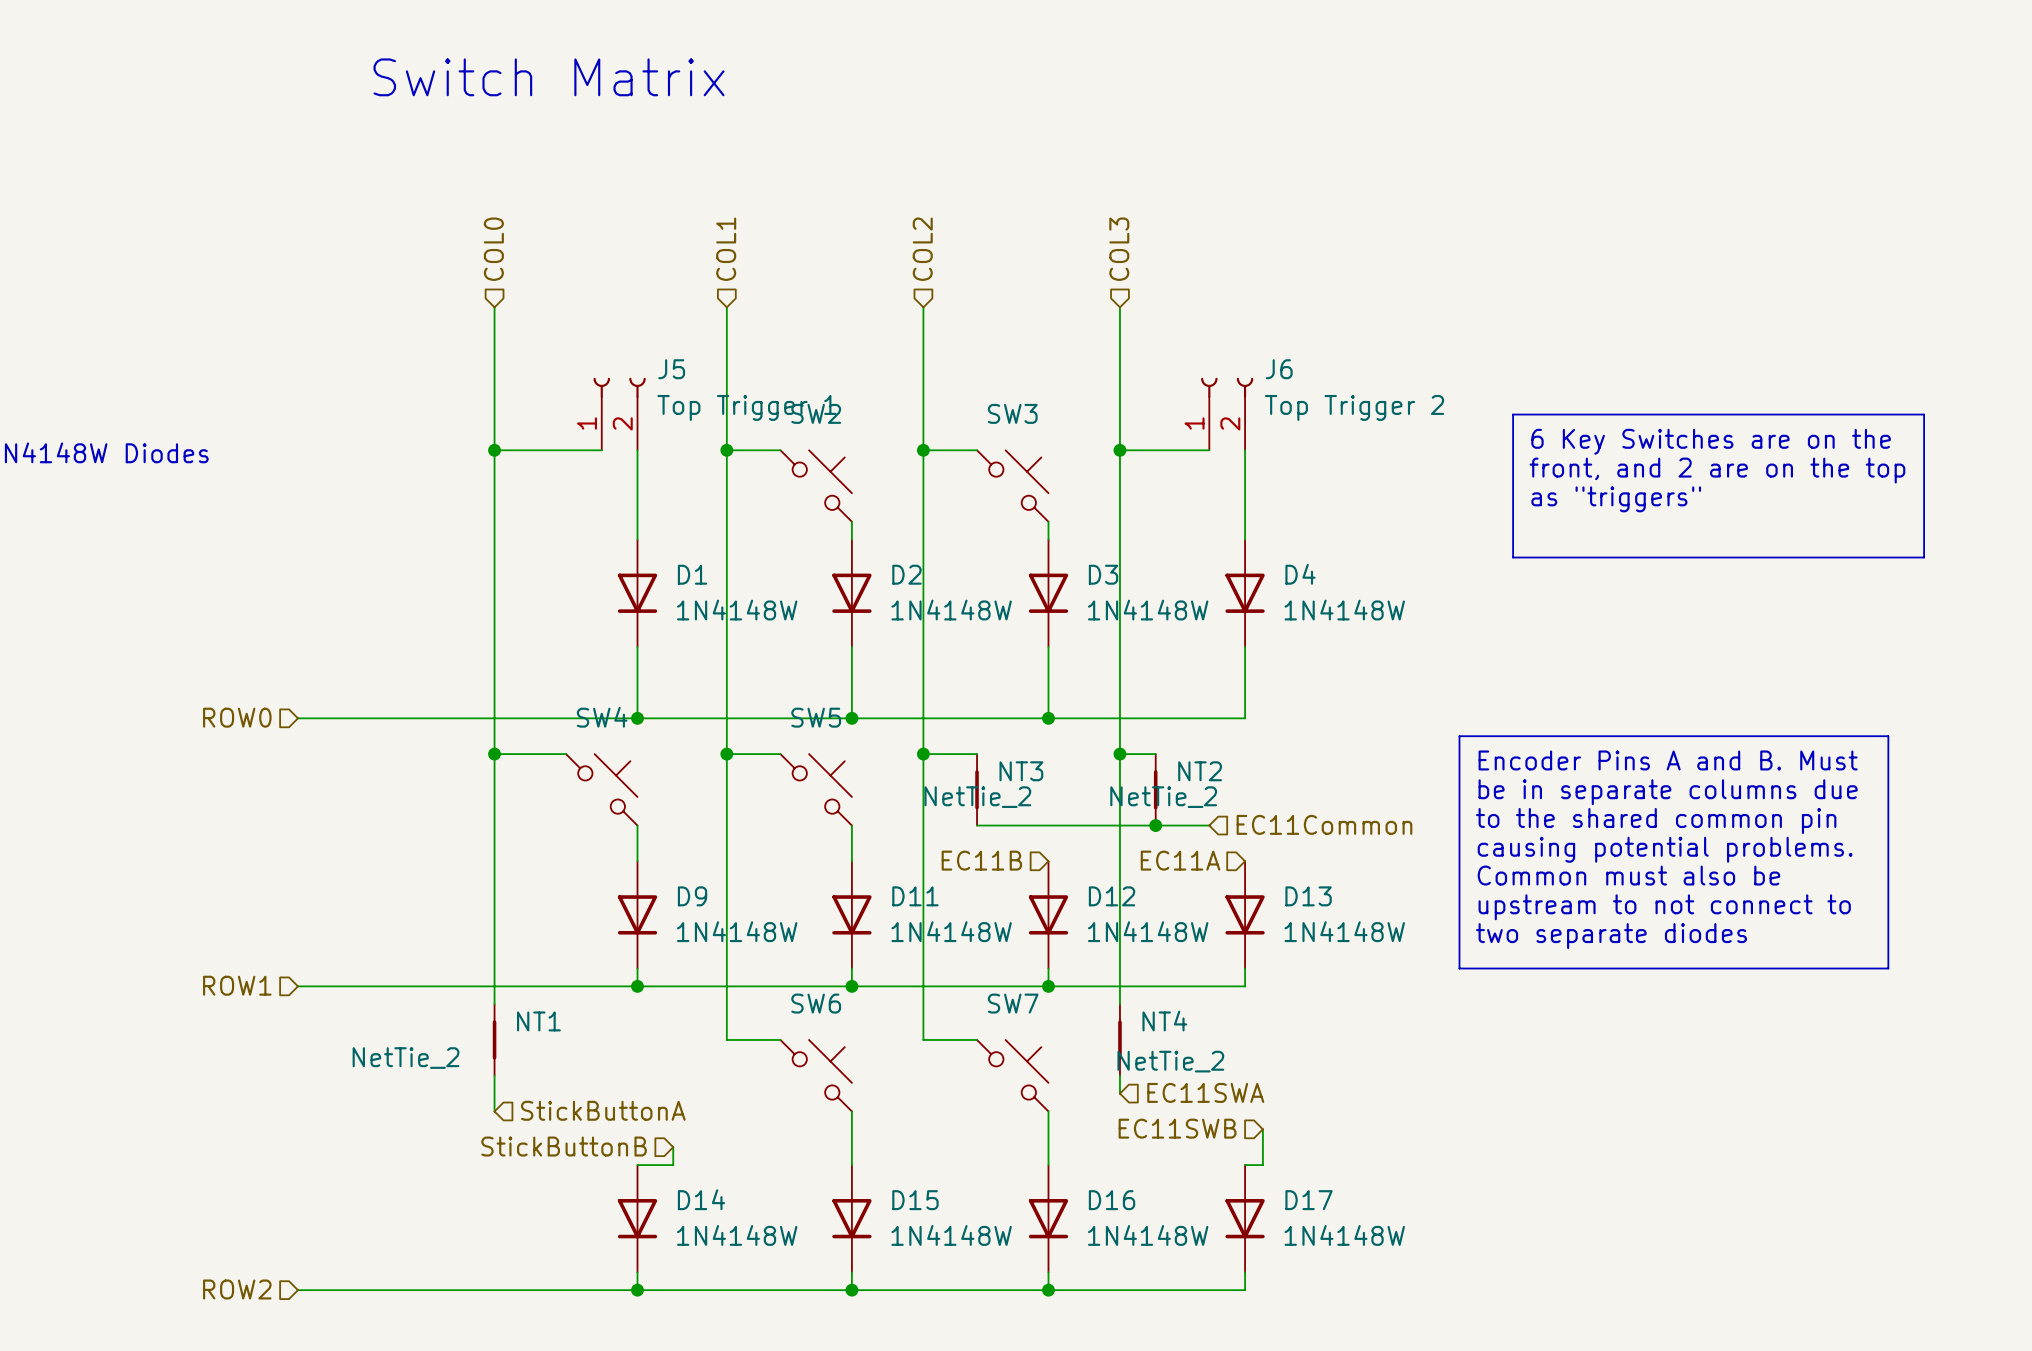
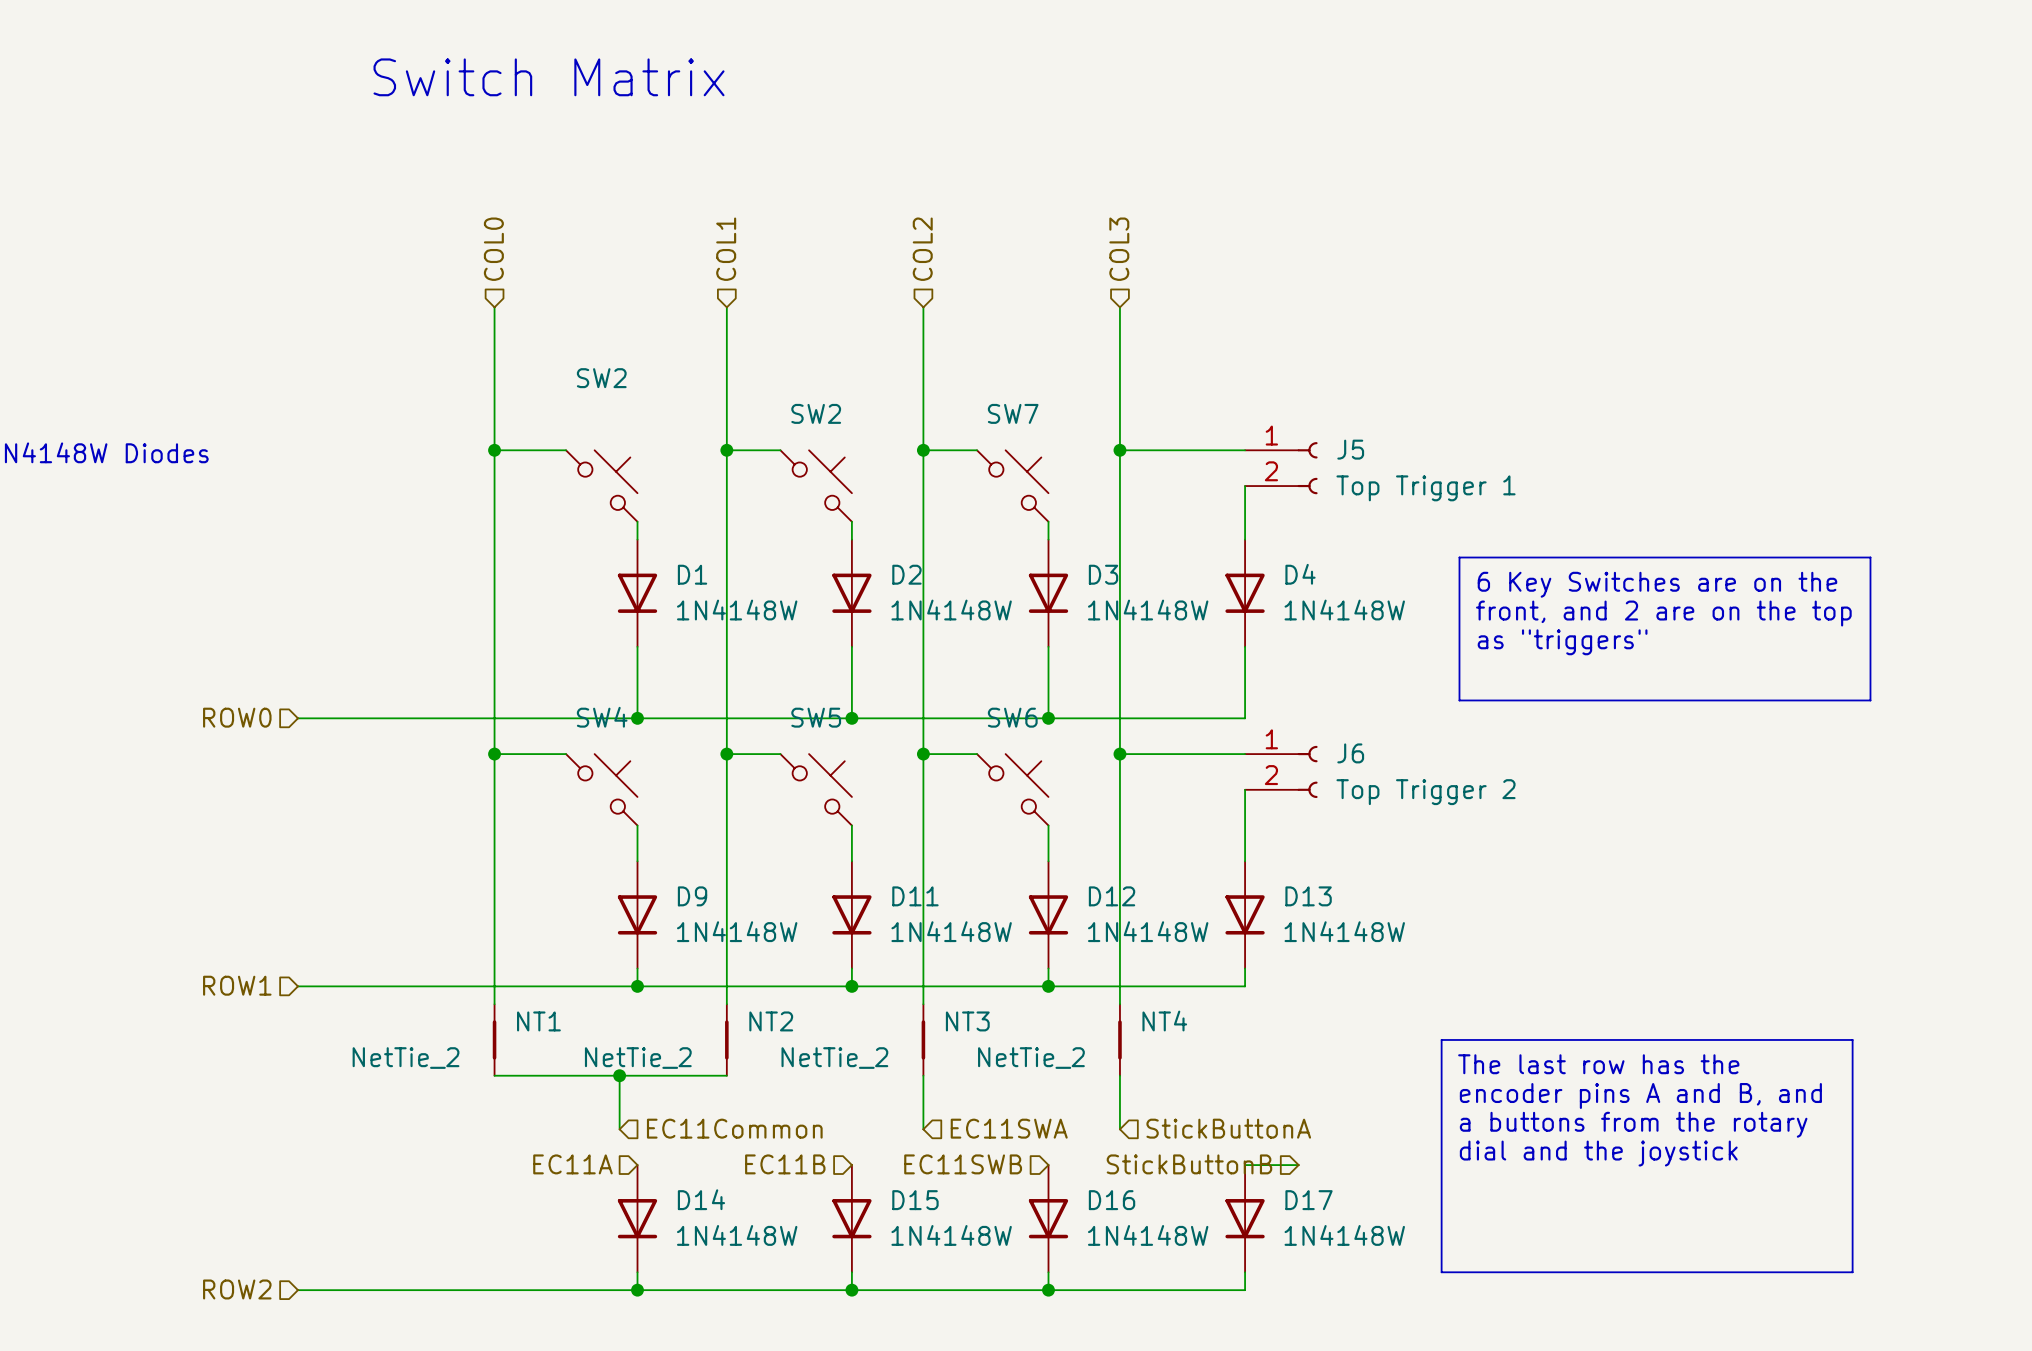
J5 name position: J5 (671, 369) -> J5 (1350, 449)
J6 name position: J6 (1279, 369) -> J6 (1350, 753)
J5 rotation: 0° (619, 387) -> 90° clockwise (1307, 468)
J6 rotation: 0° (1227, 387) -> 90° clockwise (1307, 771)
J5 value position: Top Trigger 1 (746, 407) -> Top Trigger 1 (1426, 488)
J6 value position: Top Trigger 2 (1354, 407) -> Top Trigger 2 (1426, 792)
SW3 name: SW3 (1012, 413) -> SW7 (1013, 413)
J5 position: (619, 414) -> (1281, 468)
J6 position: (1227, 414) -> (1281, 771)
text position: 6 Key Switches are on the (1711, 441) -> 6 Key Switches are on the (1657, 584)
wire: (566, 450) (601, 450) -> none
wire: (637, 450) (637, 521) -> none
wire: (1245, 450) (1245, 486) -> (1245, 450) (1209, 450)
text position: front, and 2 are on the top (1717, 470) -> front, and 2 are on the top (1663, 613)
SW2: none -> (601, 486)
text position: as "triggers" (1616, 499) -> as "triggers" (1562, 642)
line: (1513, 557) (1513, 414) (1924, 414) (1924, 557) (1870, 557) -> (1513, 557) (1459, 557) (1459, 700) (1870, 700) (1870, 557)
line: (1459, 736) (1888, 736) (1888, 968) (1459, 968) (1459, 736) -> none
wire: none -> (1155, 754) (1245, 754)
text: Encoder Pins A and B. Must (1668, 760) -> none
NT3 position: (977, 789) -> (923, 1039)
NT2 position: (1155, 789) -> (726, 1039)
wire: none -> (1245, 789) (1245, 861)
text: be in separate columns due (1668, 792) -> none
NT3 value position: NetTie_2 (977, 797) -> NetTie_2 (834, 1058)
NT2 value position: NetTie_2 (1163, 797) -> NetTie_2 (638, 1058)
text: to the shared common pin (1656, 820) -> none
hierarchical label: EC11Common (1324, 824) -> none
wire: (977, 825) (1209, 825) -> none
wire: none -> (1048, 825) (1048, 861)
junction: (1155, 825) -> none
text: causing potential problems. (1665, 849) -> none
hierarchical label: EC11B (981, 860) -> none
hierarchical label: EC11A (1180, 860) -> none
text: Common must also be (1628, 875) -> none
text: upstream to not connect to (1664, 907) -> none
text: two separate diodes (1611, 936) -> none
wire: (726, 1004) (726, 1039) (780, 1039) -> none
wire: (923, 1004) (923, 1039) (977, 1039) -> none
line: none -> (1441, 1039) (1852, 1039) (1852, 1272) (1441, 1272) (1441, 1039)
NT4 value position: NetTie_2 (1170, 1061) -> NetTie_2 (1031, 1058)
text: none -> The last row has the (1598, 1064)
wire: (494, 1075) (494, 1111) -> (494, 1075) (726, 1075)
wire: none -> (619, 1075) (619, 1129)
junction: none -> (619, 1075)
SW6 position: (816, 1075) -> (1012, 789)
SW7: (1012, 1075) -> none
hierarchical label position: EC11SWA (1205, 1092) -> EC11SWA (1009, 1128)
wire: none -> (1119, 1093) (1119, 1129)
text: none -> encoder pins A and B, and (1640, 1095)
hierarchical label: StickButtonA (603, 1110) -> none
wire: (851, 1111) (851, 1165) -> (923, 1075) (923, 1129)
wire: (1048, 1111) (1048, 1165) -> none
text: none -> a buttons from the rotary (1633, 1124)
hierarchical label: none -> EC11Common (734, 1128)
hierarchical label position: EC11SWB (1177, 1128) -> EC11SWB (963, 1164)
hierarchical label: none -> StickButtonA (1228, 1128)
wire: (1262, 1129) (1262, 1165) -> (1298, 1165) (1262, 1165)
hierarchical label: StickButtonB (564, 1146) -> none
wire: (673, 1147) (673, 1165) (637, 1165) -> none
text: none -> dial and the joystick (1598, 1153)
hierarchical label: none -> EC11A (572, 1164)
hierarchical label: none -> EC11B (785, 1164)
hierarchical label: none -> StickButtonB (1189, 1164)

